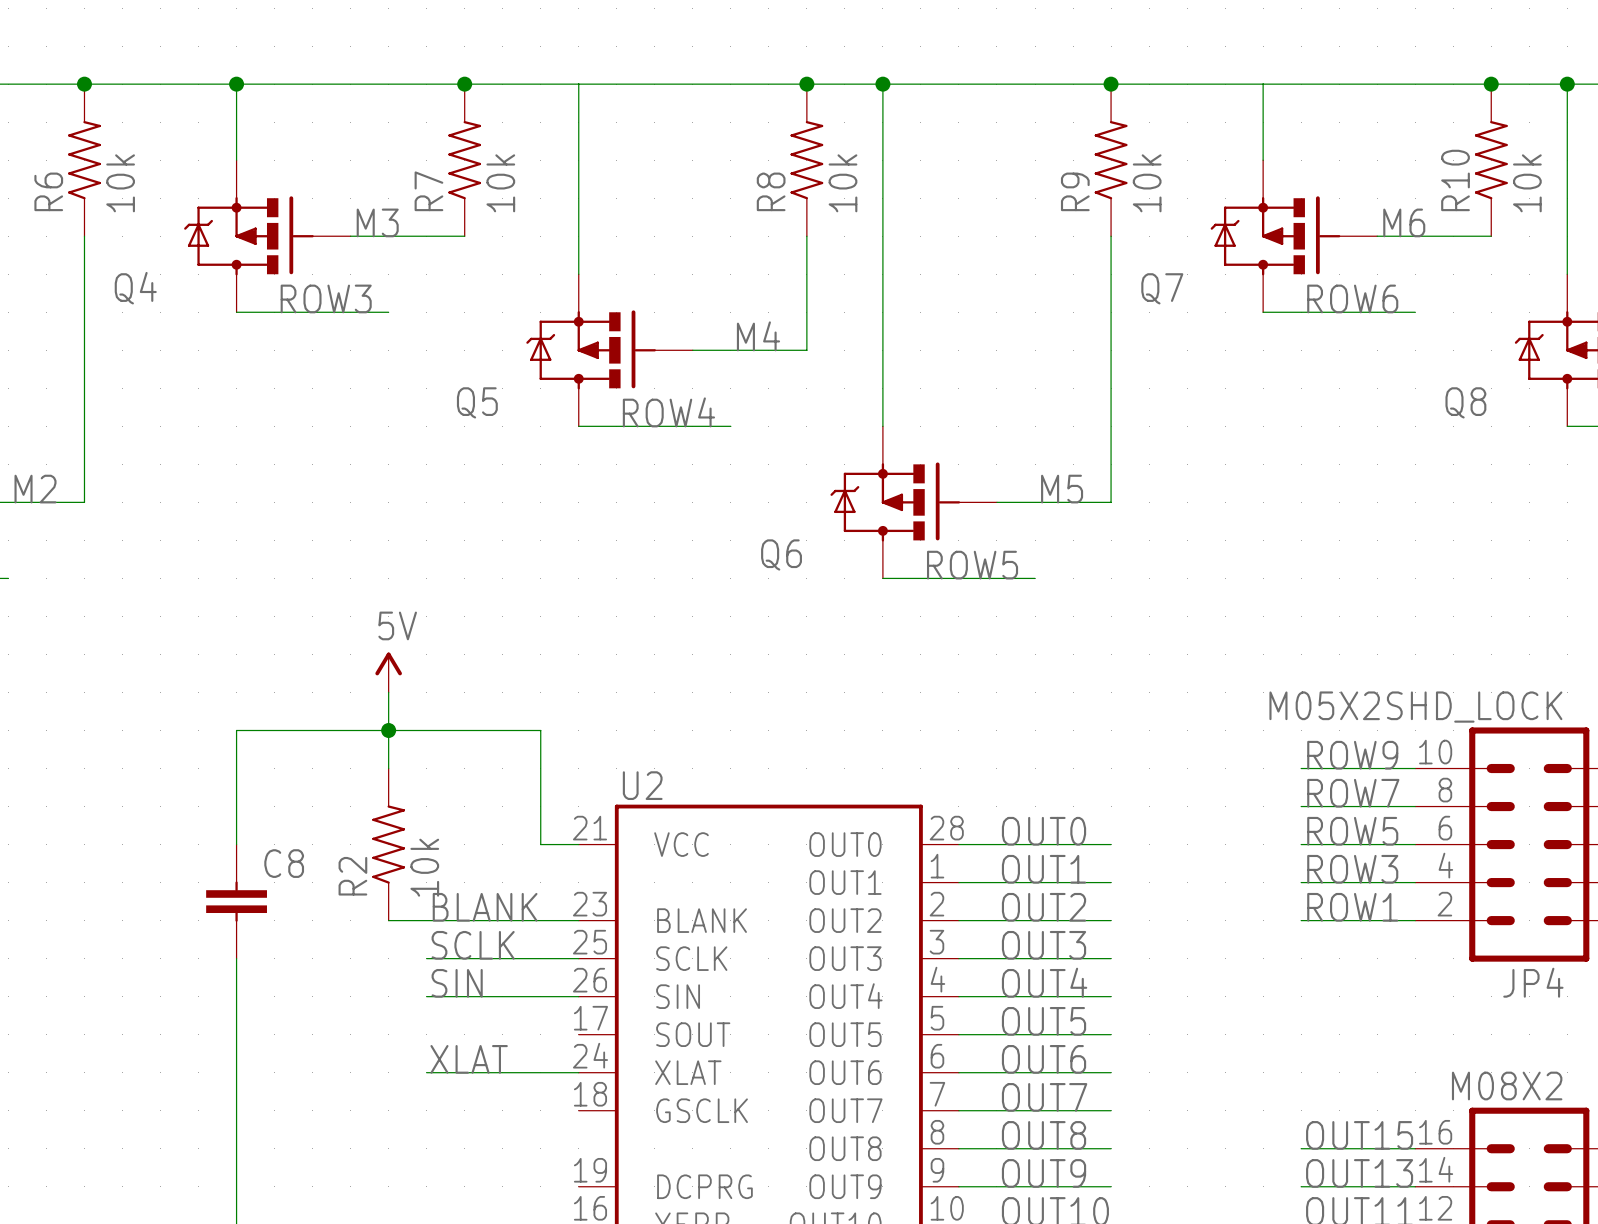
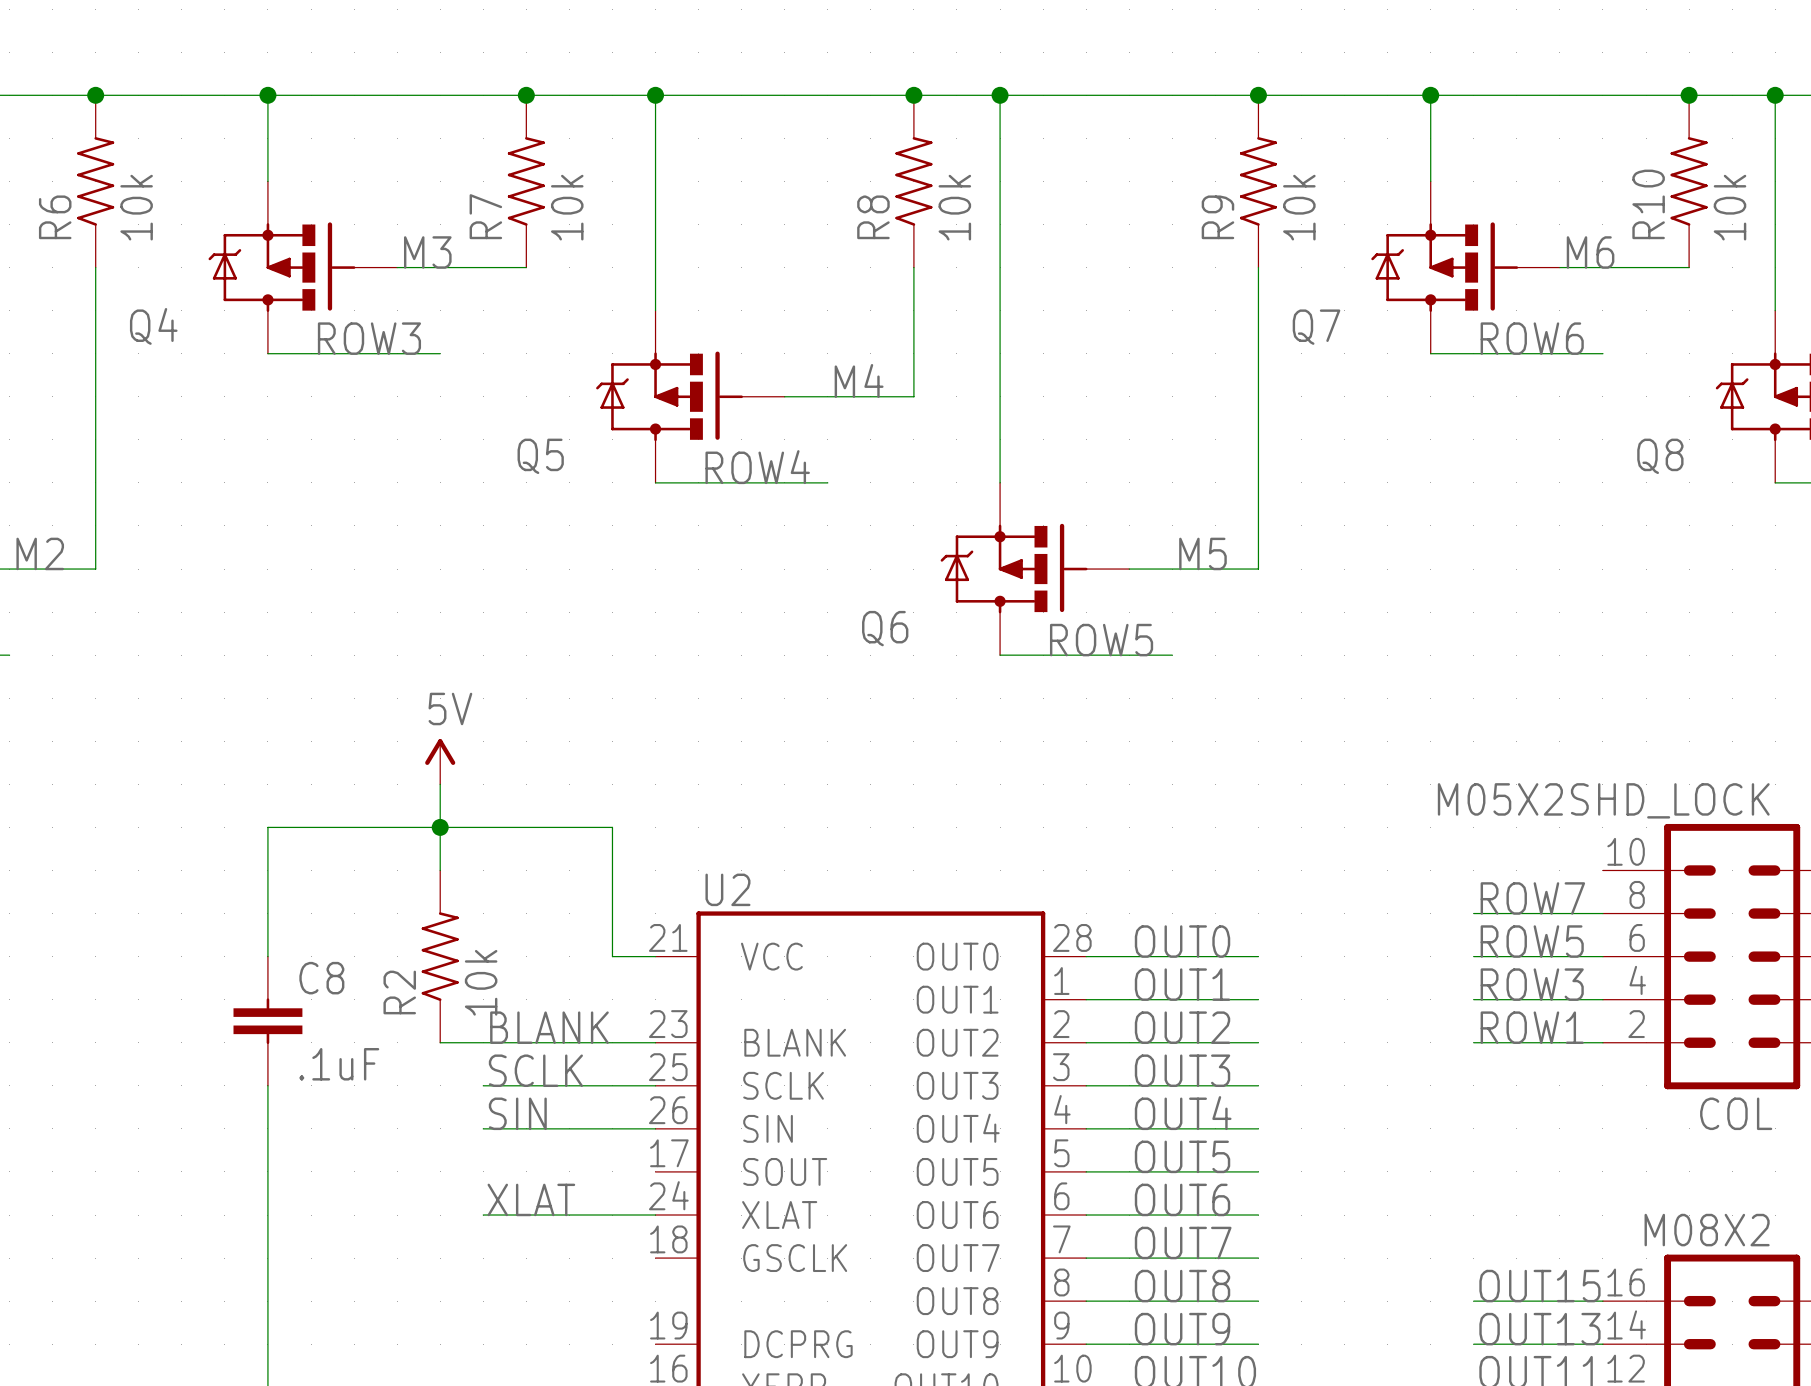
junction: none -> (655, 95)
junction: none -> (1430, 95)
label: ROW9 (1352, 755) -> none
wire: (1301, 768) (1415, 768) -> none
C8 value: none -> .1uF (339, 1064)
JP4 name: JP4 (1533, 982) -> COL (1736, 1113)

